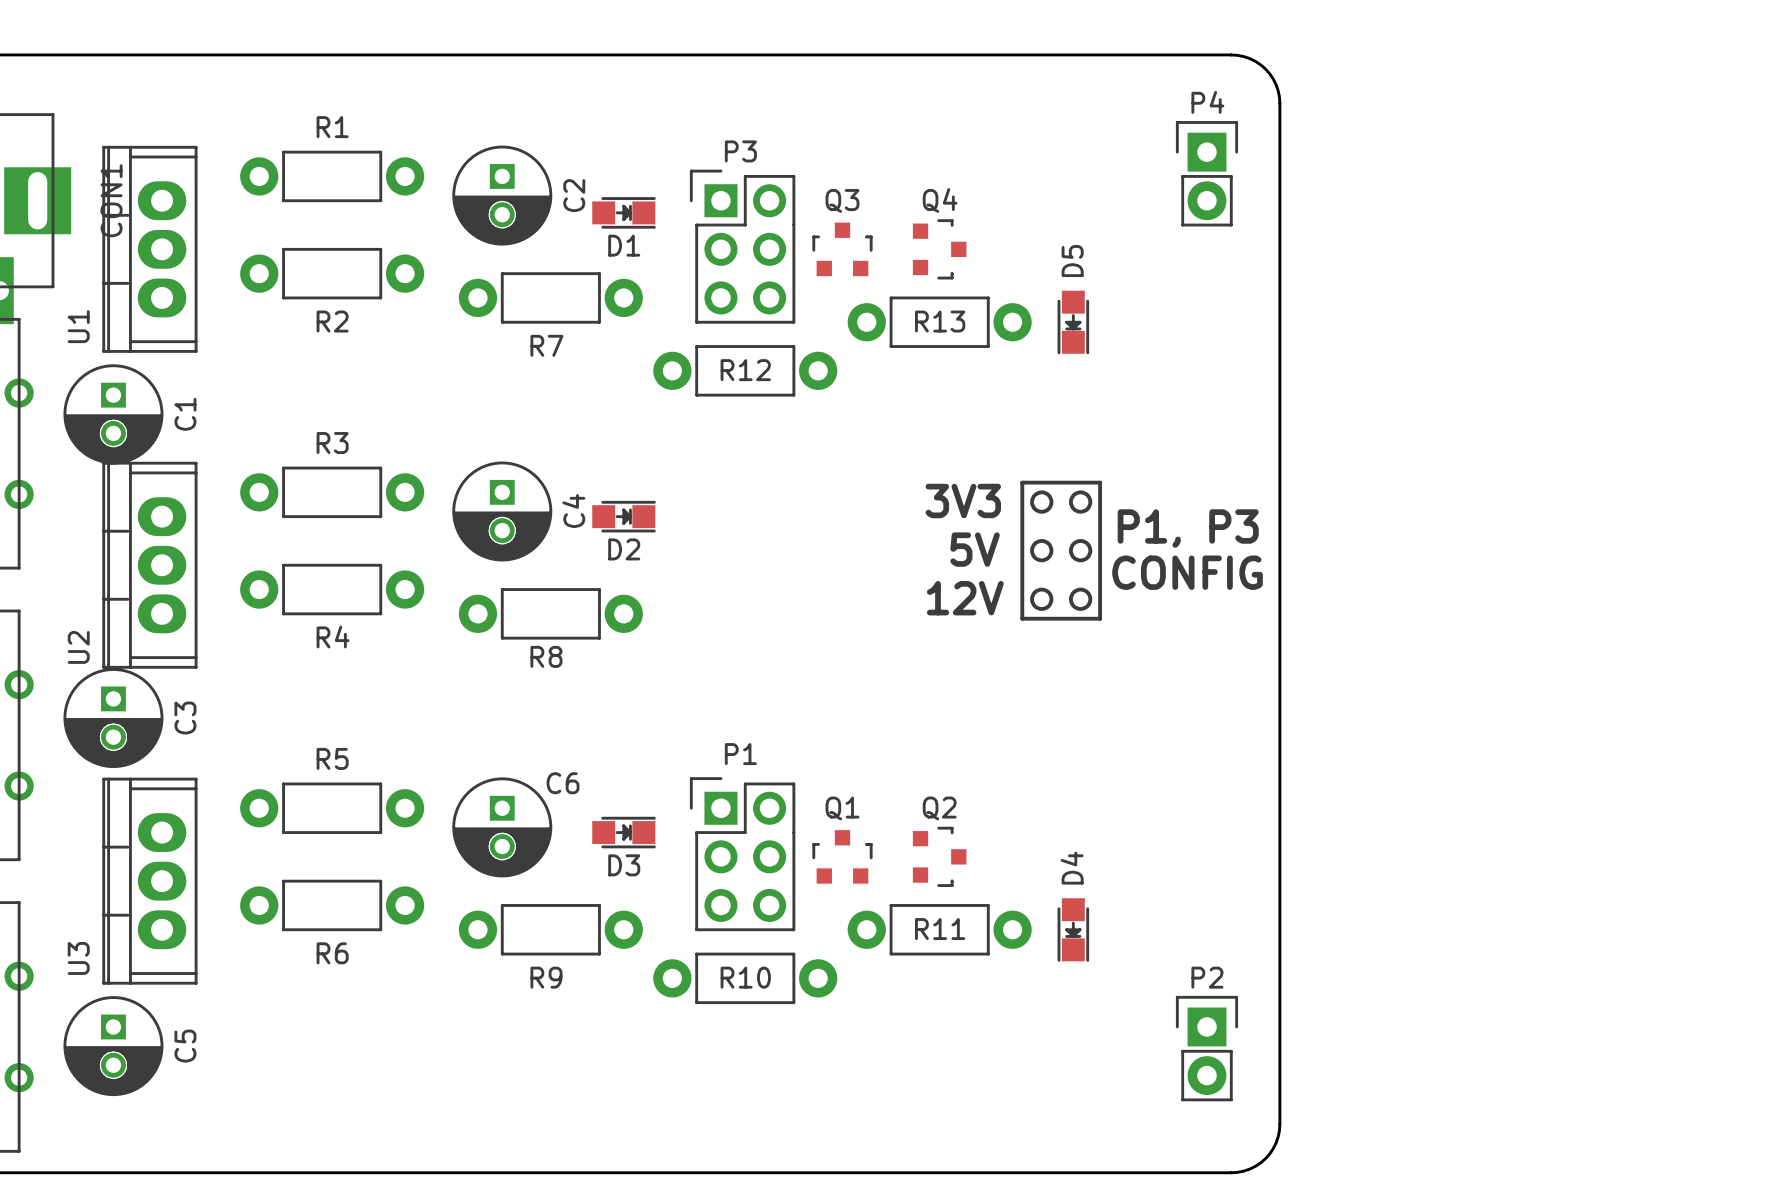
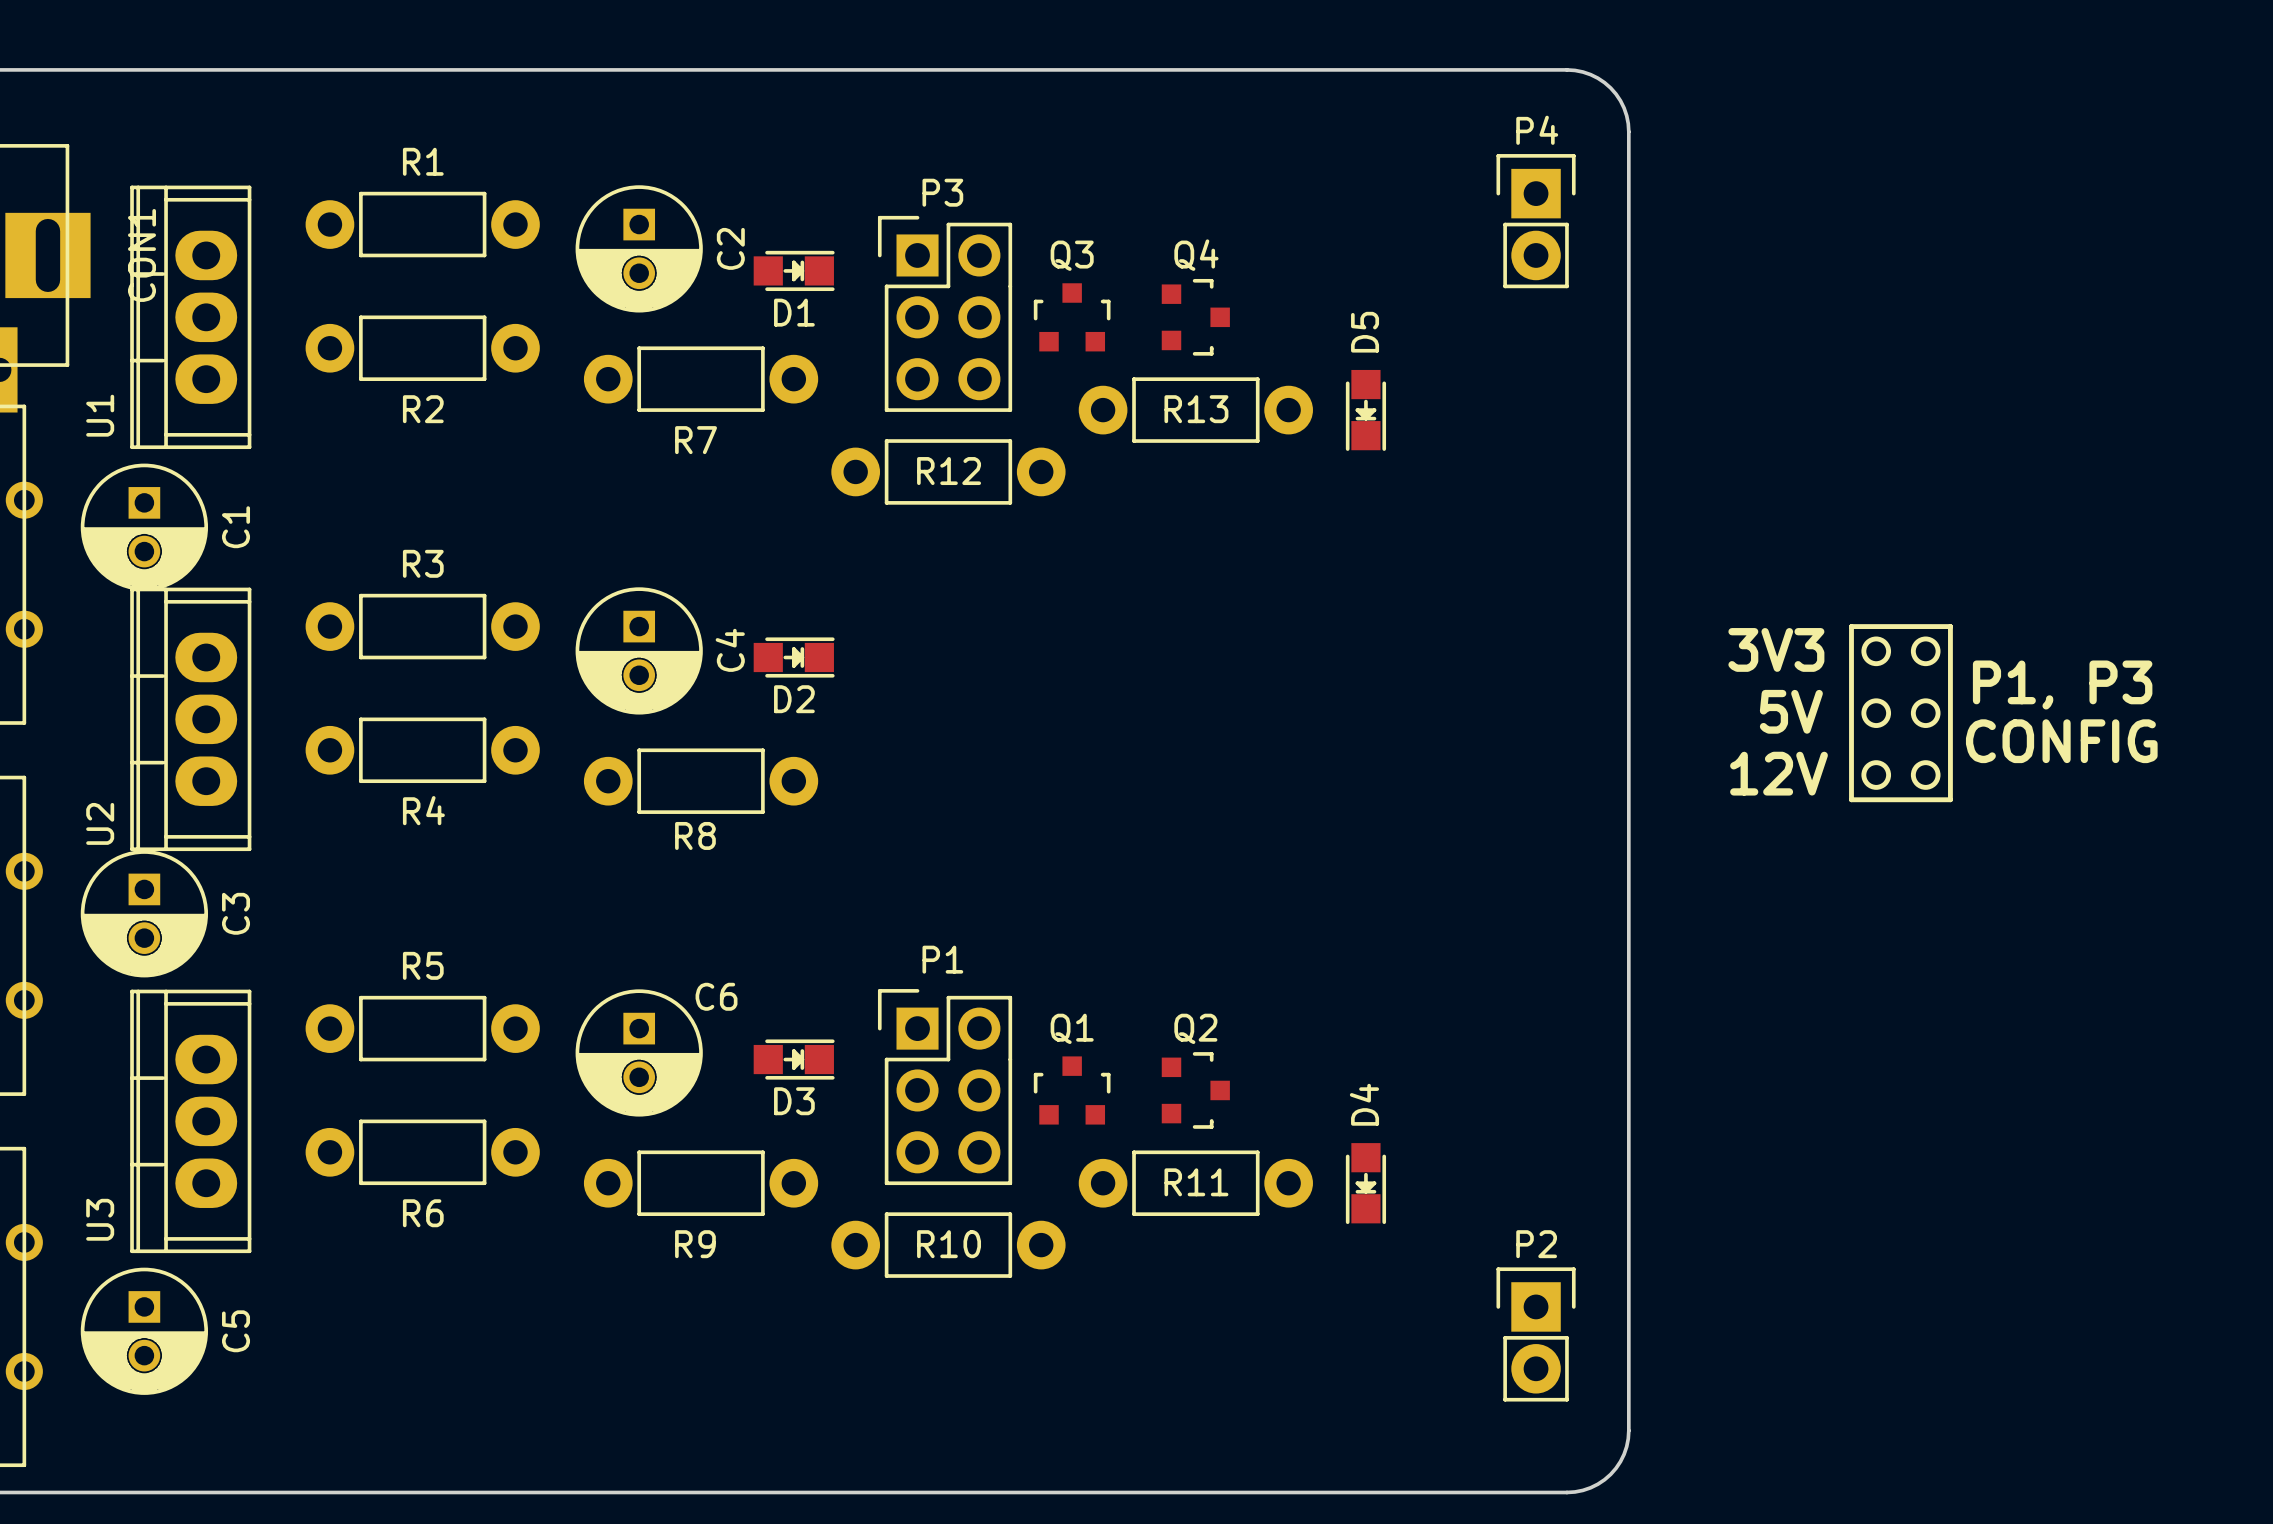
line: (1022, 482) (1100, 482) (1100, 618) (1022, 618) (1022, 482) -> (1851, 626) (1950, 626) (1950, 799) (1851, 799) (1851, 626)
drawing: [1030, 490, 1093, 514] -> none
text position: 3V3 (963, 500) -> 3V3 (1776, 649)
drawing: none -> [1861, 636, 1941, 667]
text position: P1, P3 (1188, 528) -> P1, P3 (2062, 685)
drawing: [1030, 539, 1093, 563] -> none
drawing: none -> [1861, 698, 1941, 728]
text position: 5V (975, 549) -> 5V (1791, 711)
text position: CONFIG (1187, 572) -> CONFIG (2061, 741)
drawing: [1030, 587, 1093, 611] -> none
drawing: none -> [1861, 760, 1941, 790]
text position: 12V (965, 598) -> 12V (1779, 773)

